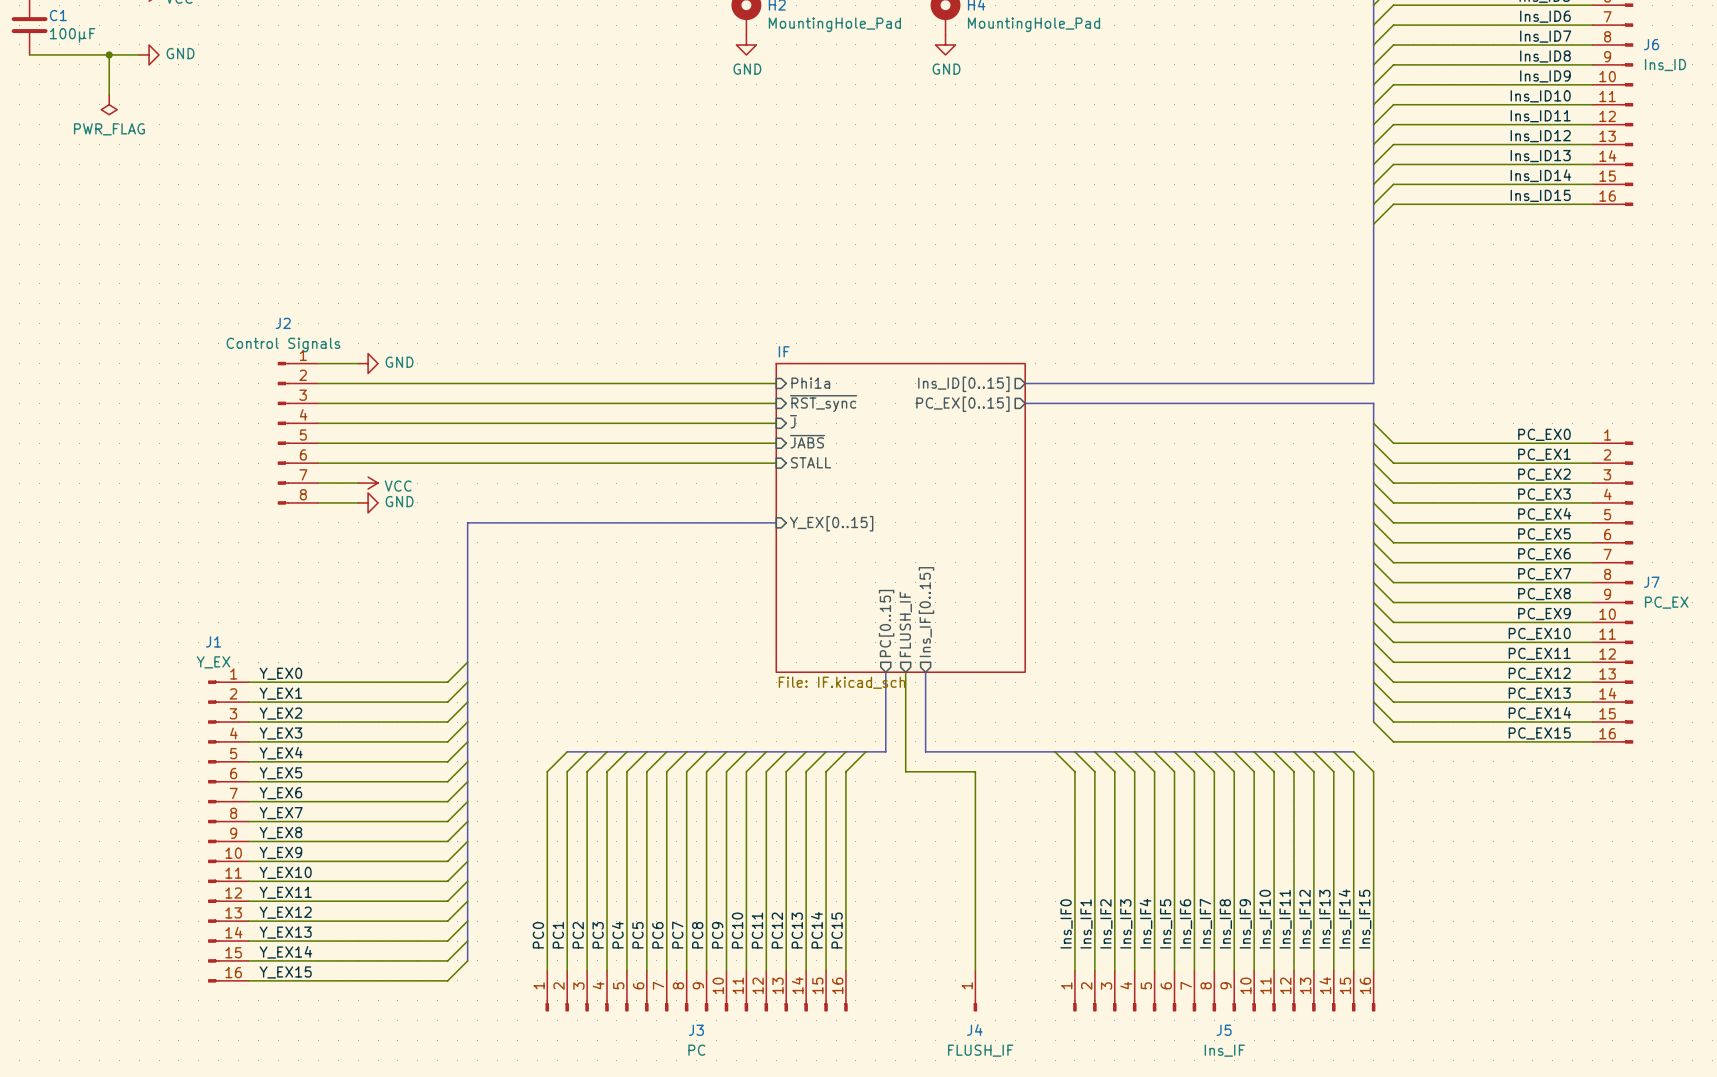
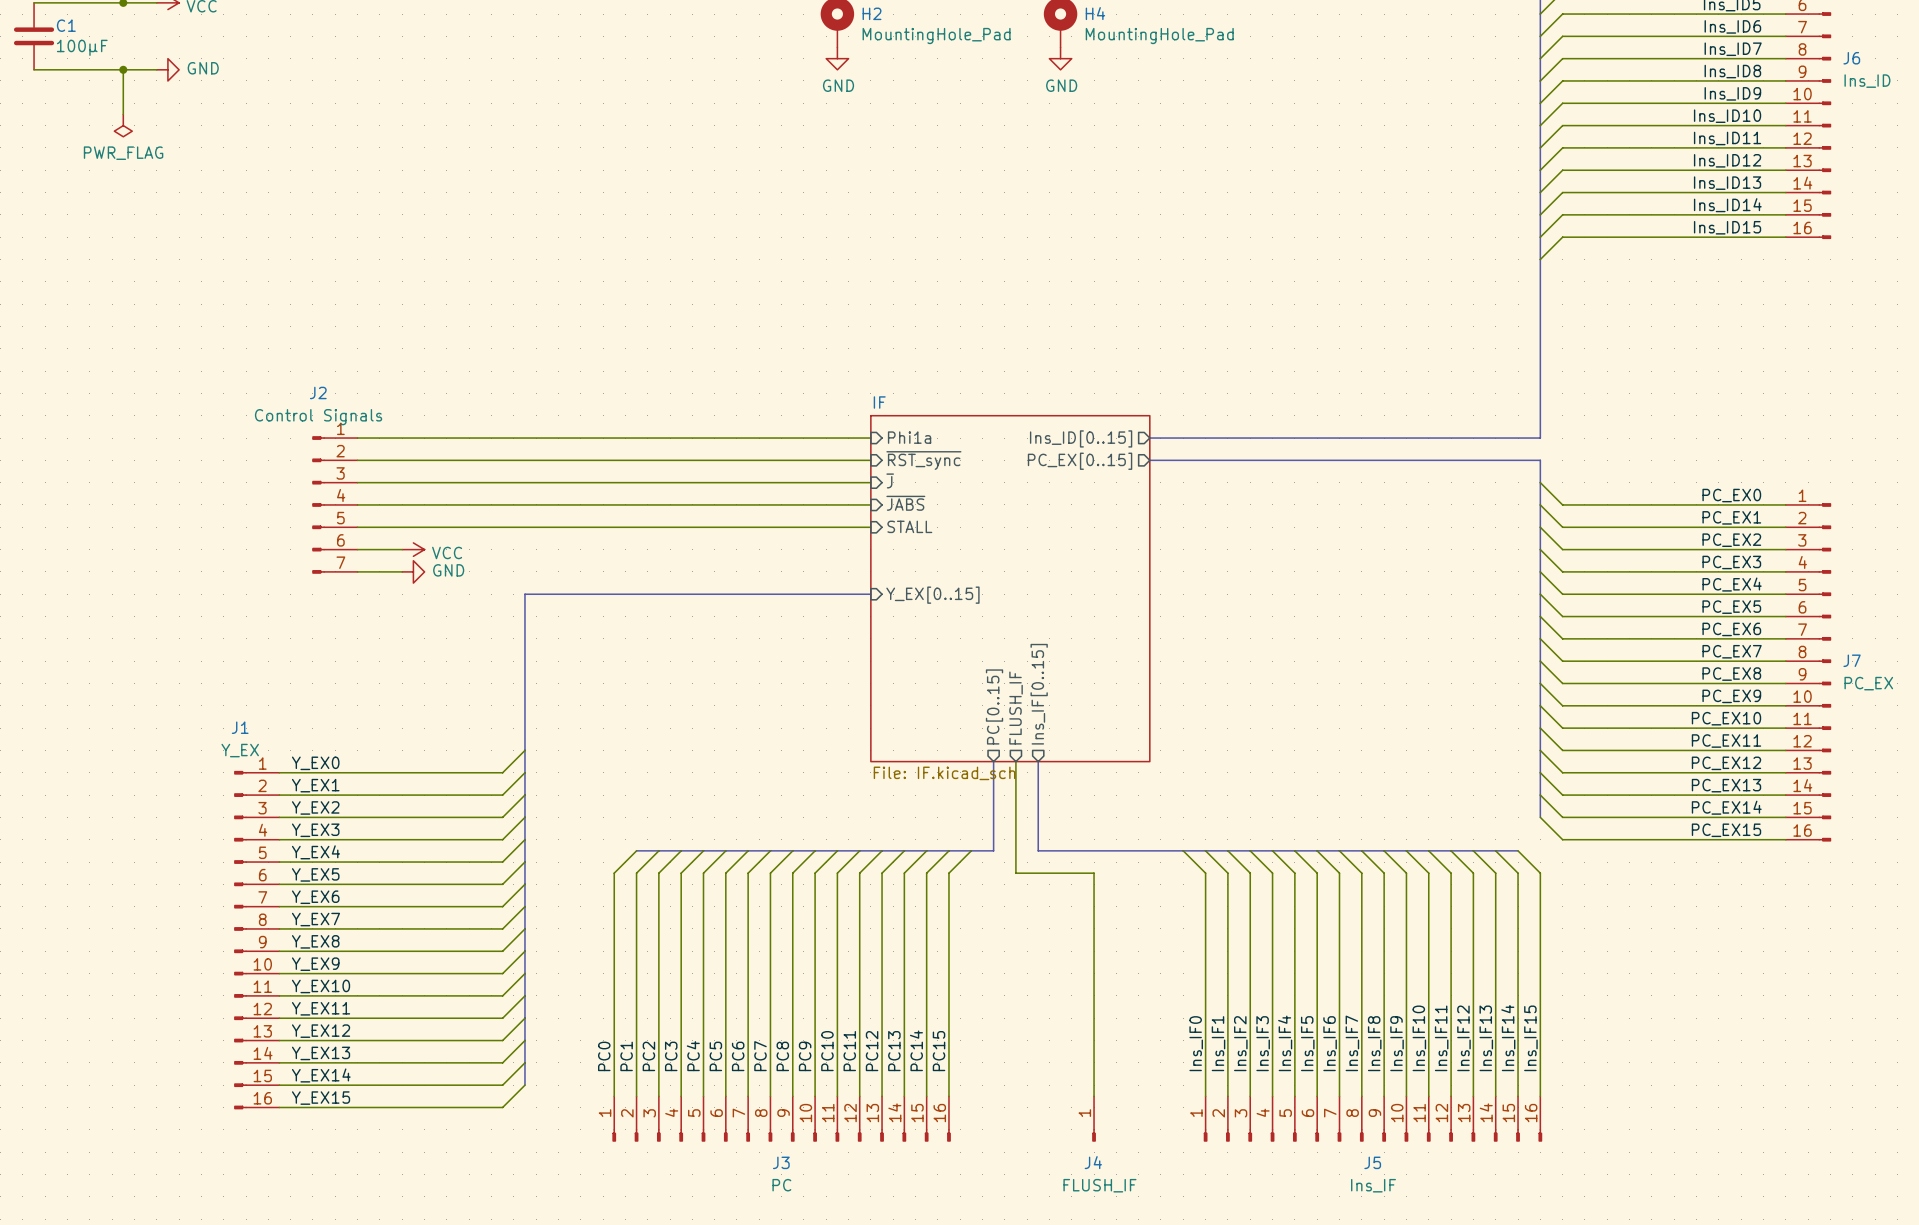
J2 symbol: [277, 361, 319, 505] -> [312, 436, 358, 574]
wire: (318, 363) (358, 363) -> none
power symbol: GND (368, 363) -> none

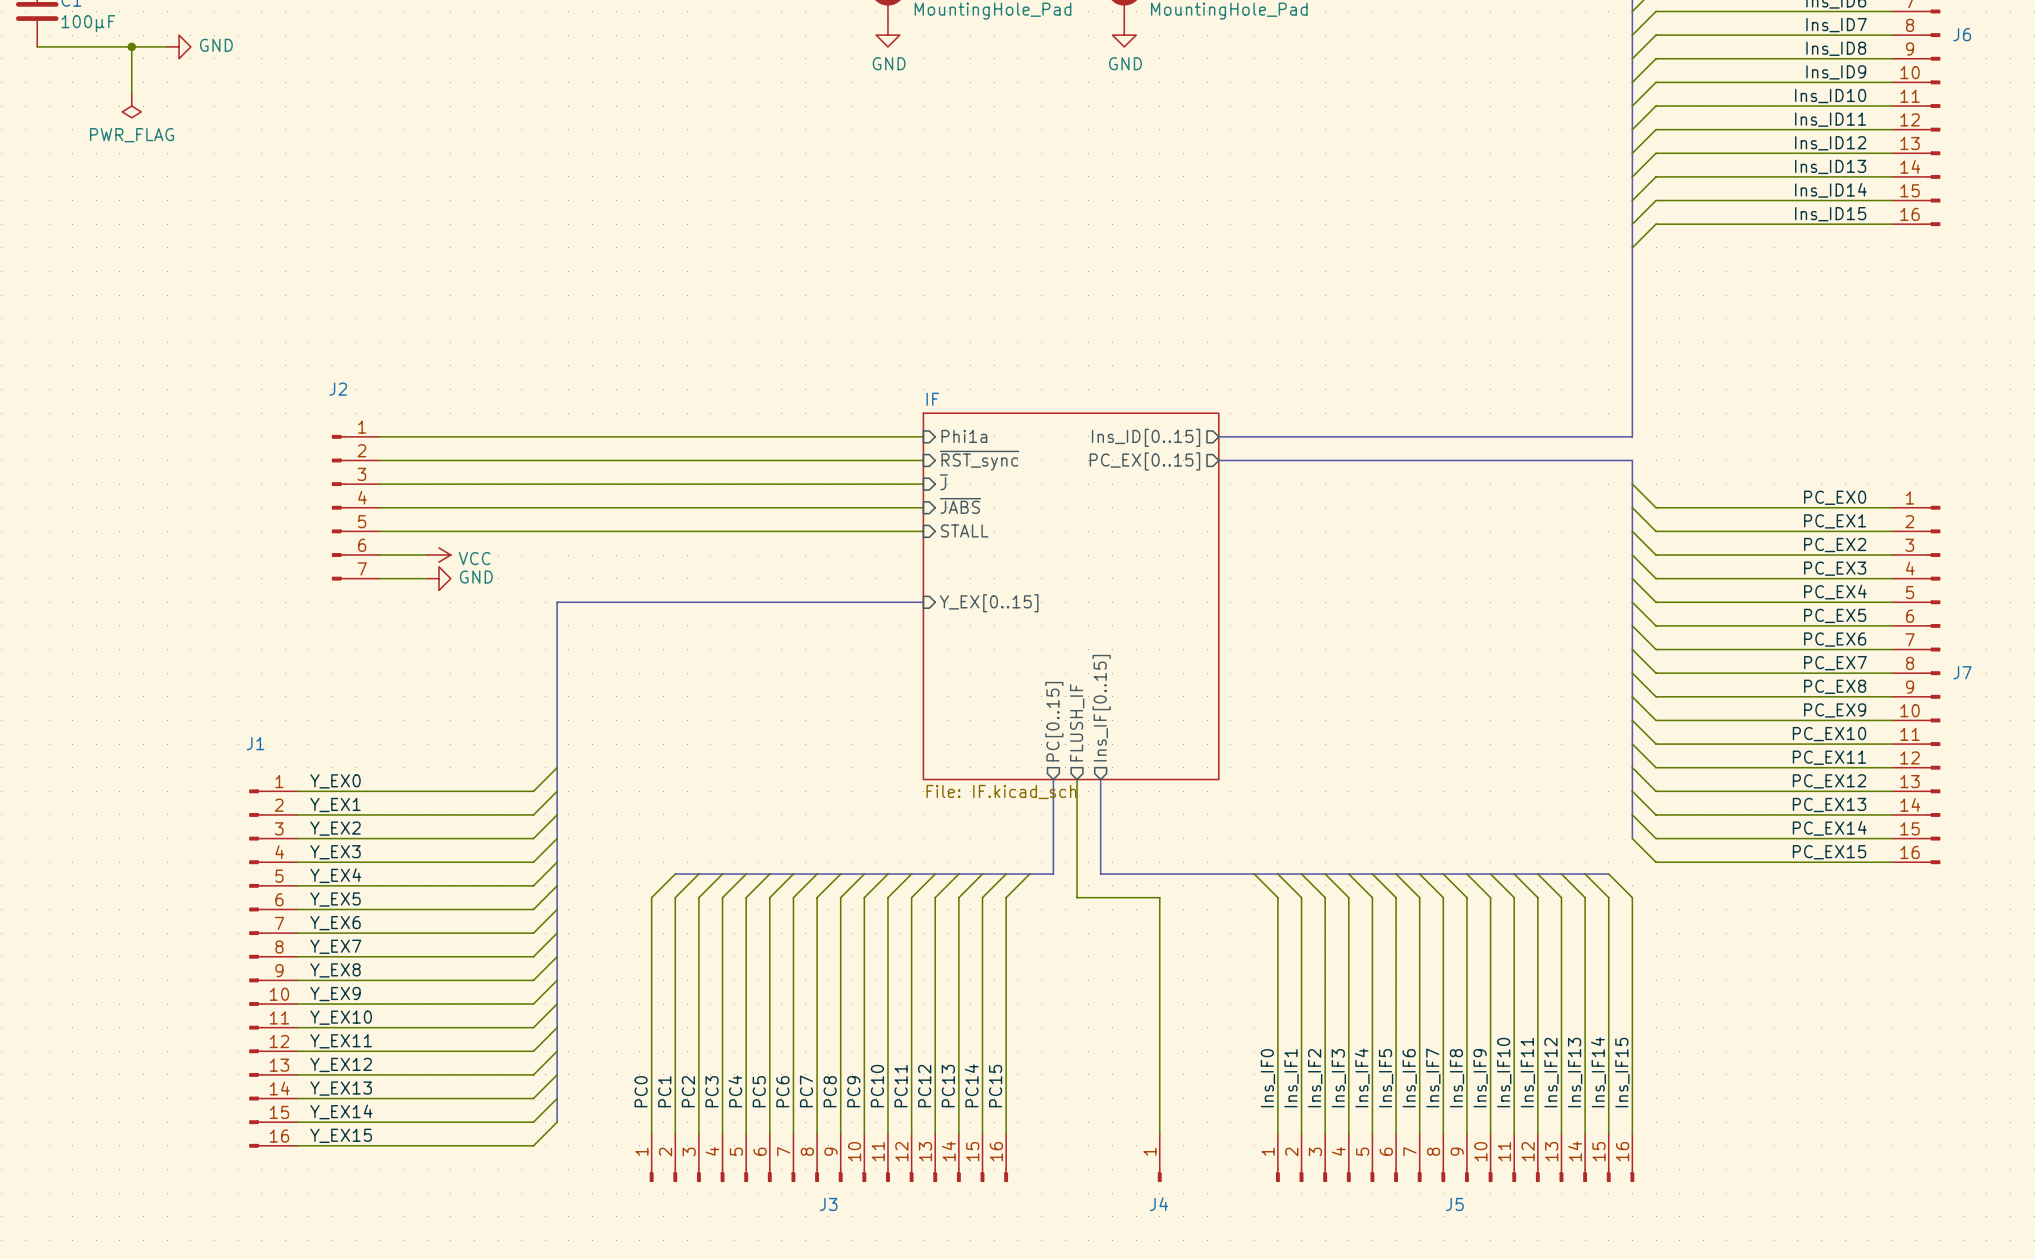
J6 value: Ins_ID (1867, 81) -> none
J2 value: Control Signals (318, 417) -> none
J7 value: PC_EX (1868, 683) -> none
J1 value: Y_EX (240, 750) -> none
J3 value: PC (781, 1185) -> none
J4 value: FLUSH_IF (1099, 1185) -> none
J5 value: Ins_IF (1373, 1185) -> none

